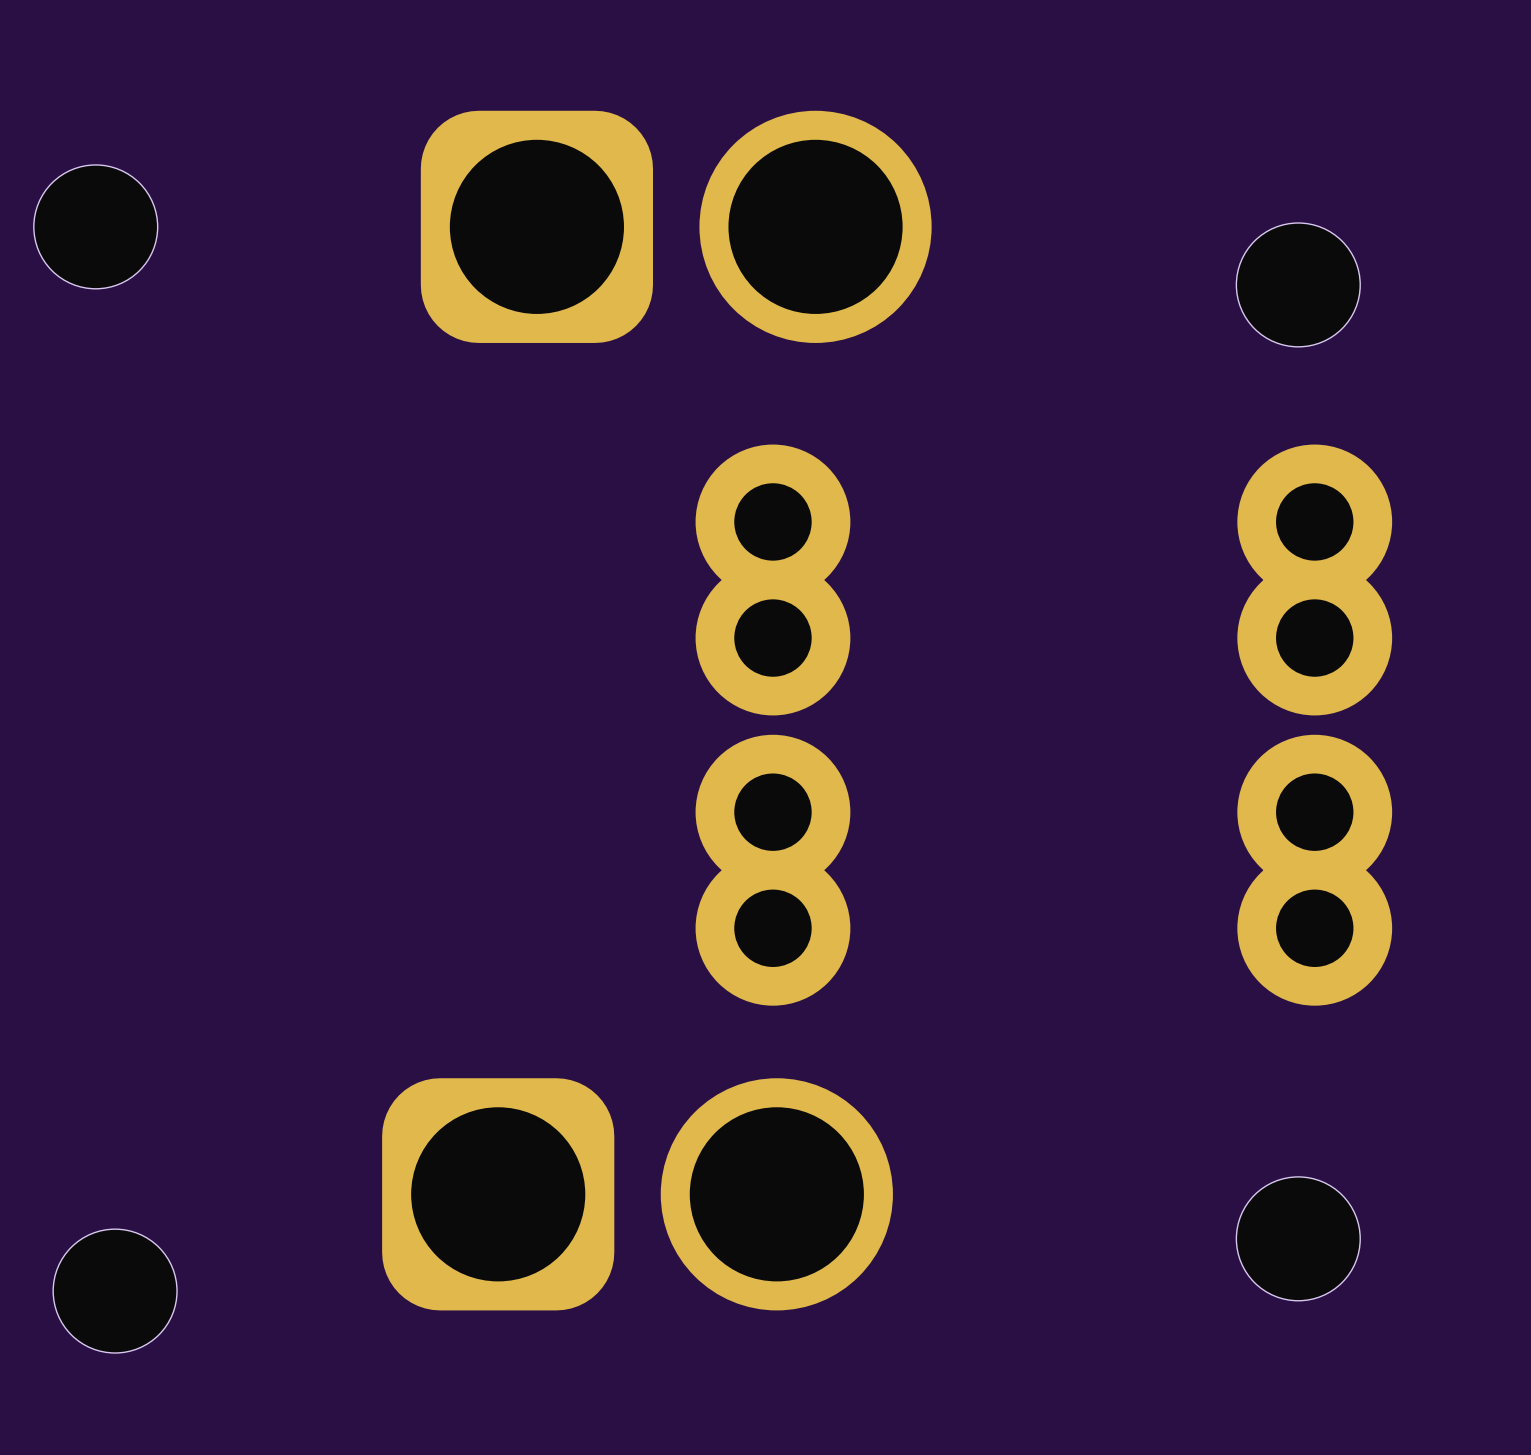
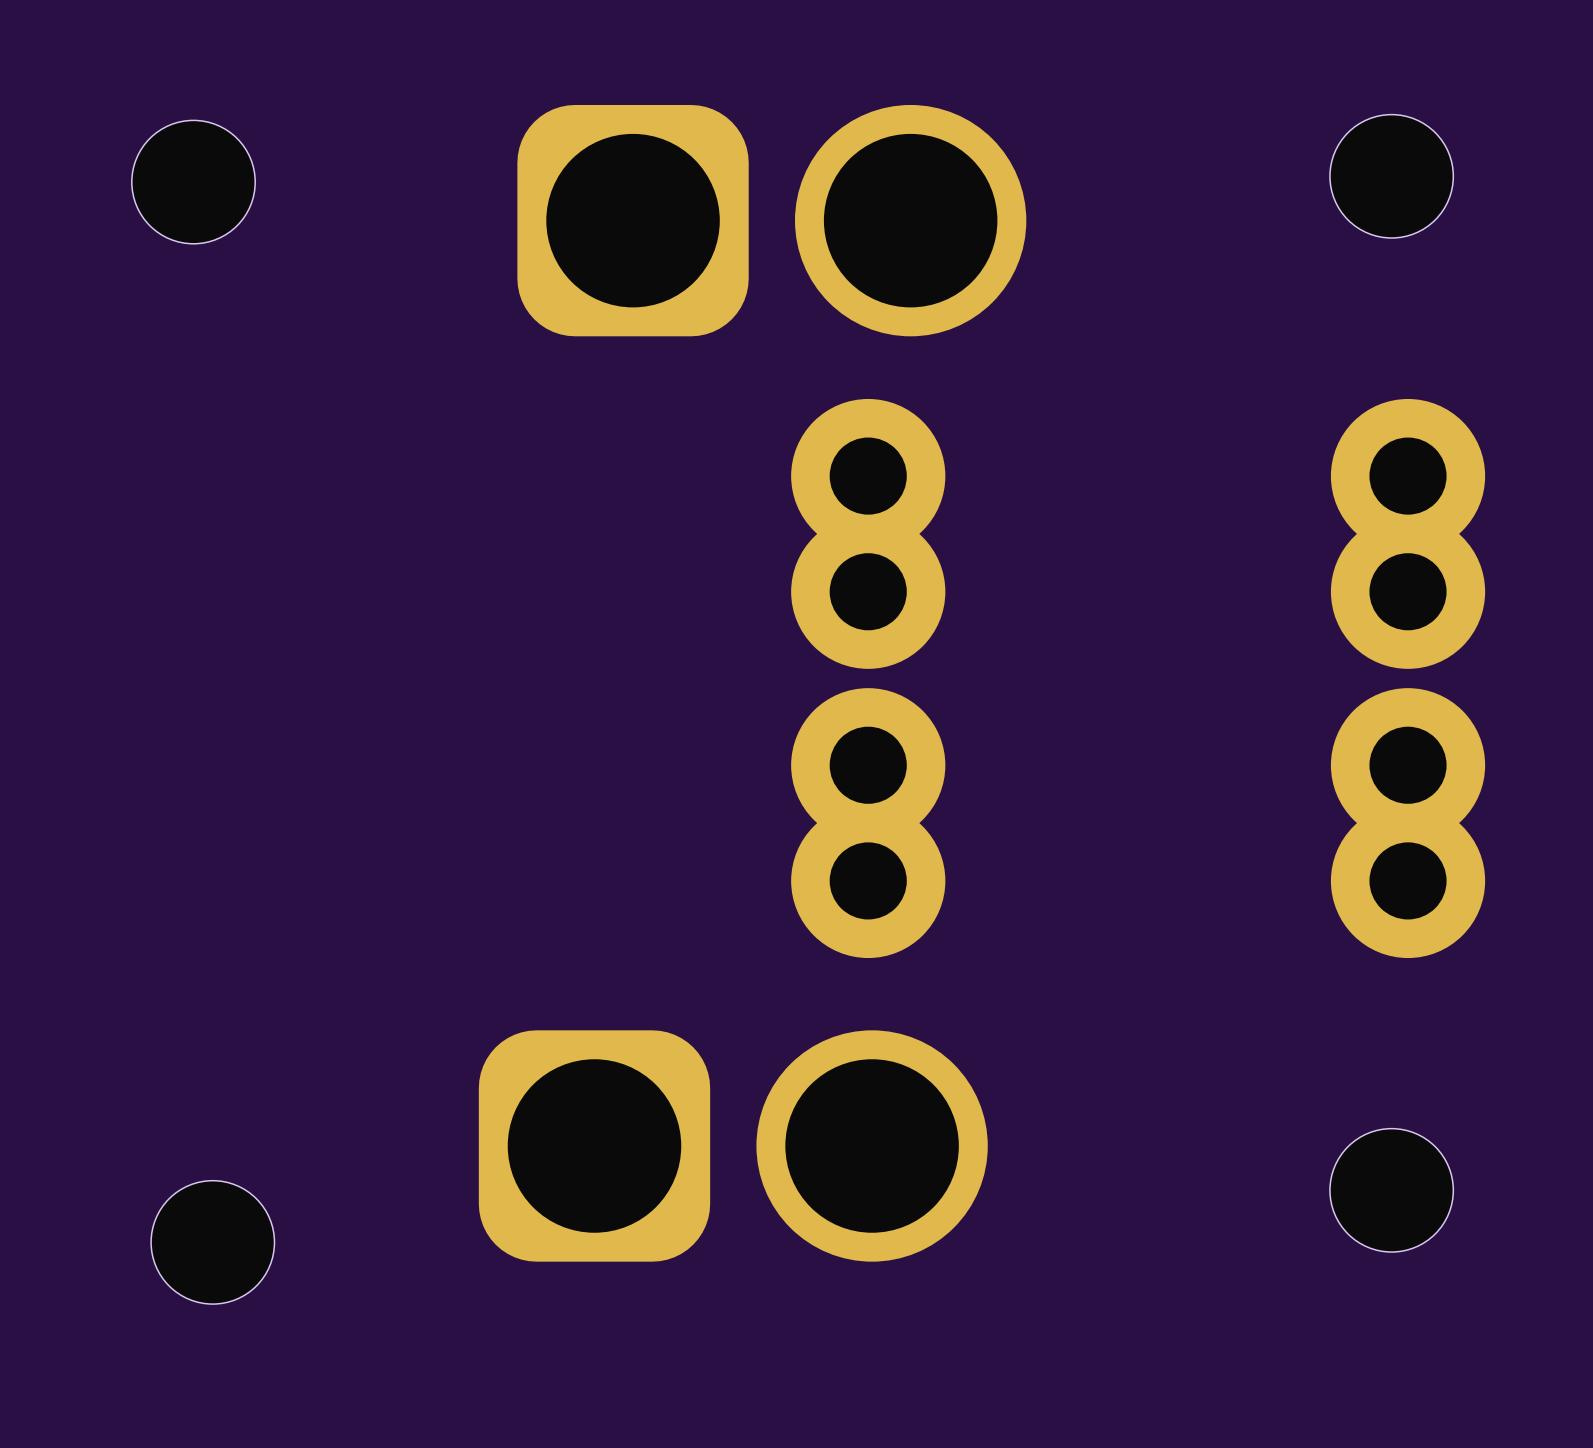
part position: (676, 226) -> (771, 220)
part position: (1298, 284) -> (1391, 176)

